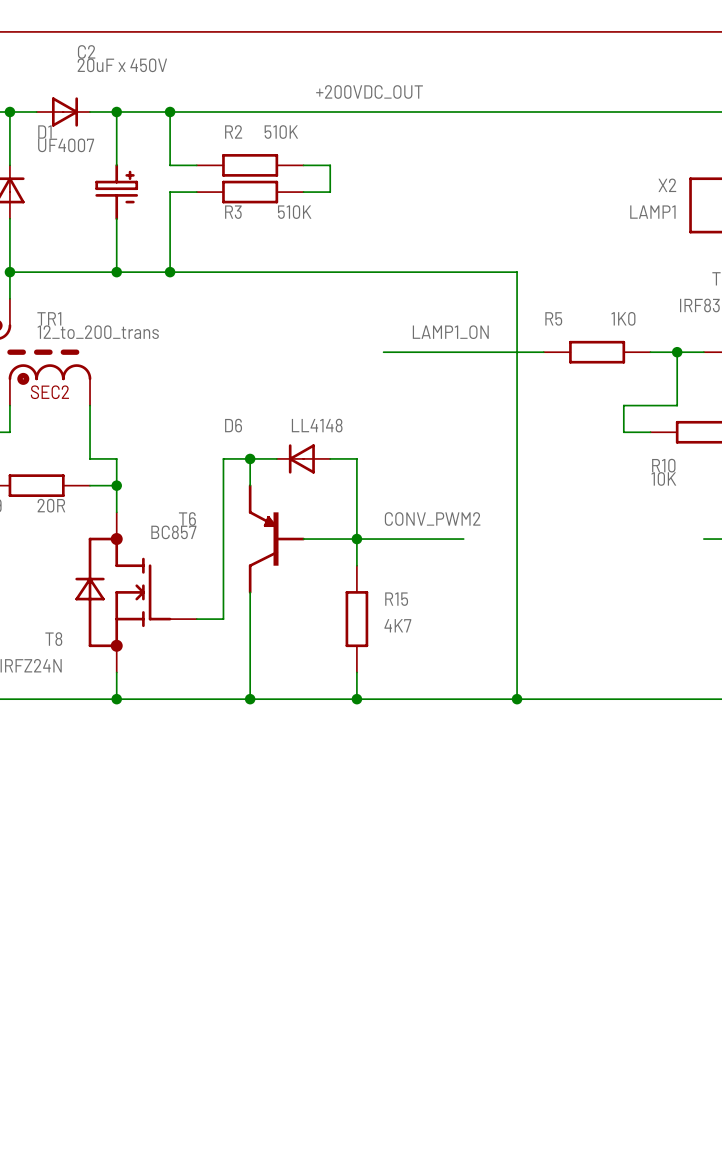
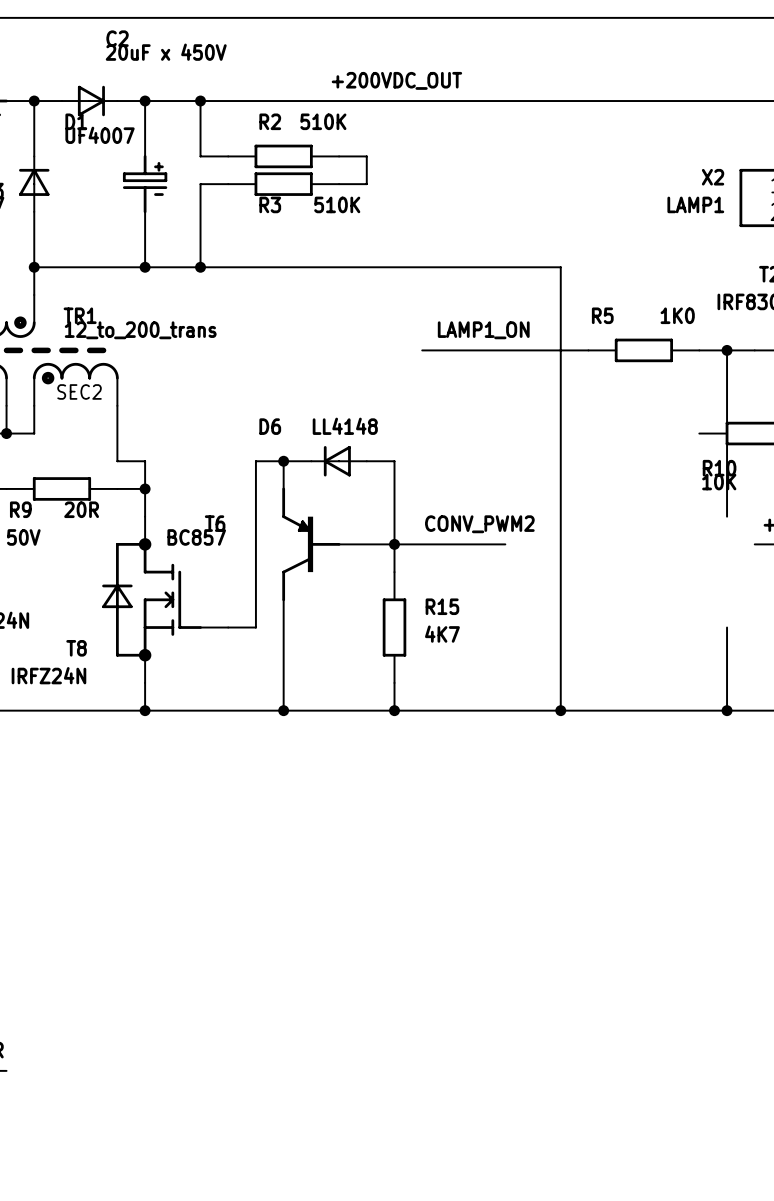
wire: (677, 405) (623, 405) (623, 432) (650, 432) -> (727, 405) (727, 516)
wire: none -> (727, 627) (727, 710)
junction: none -> (727, 710)

